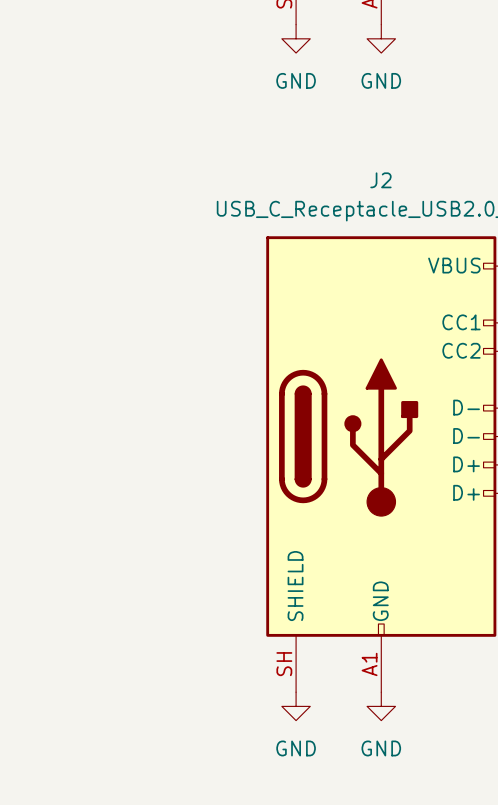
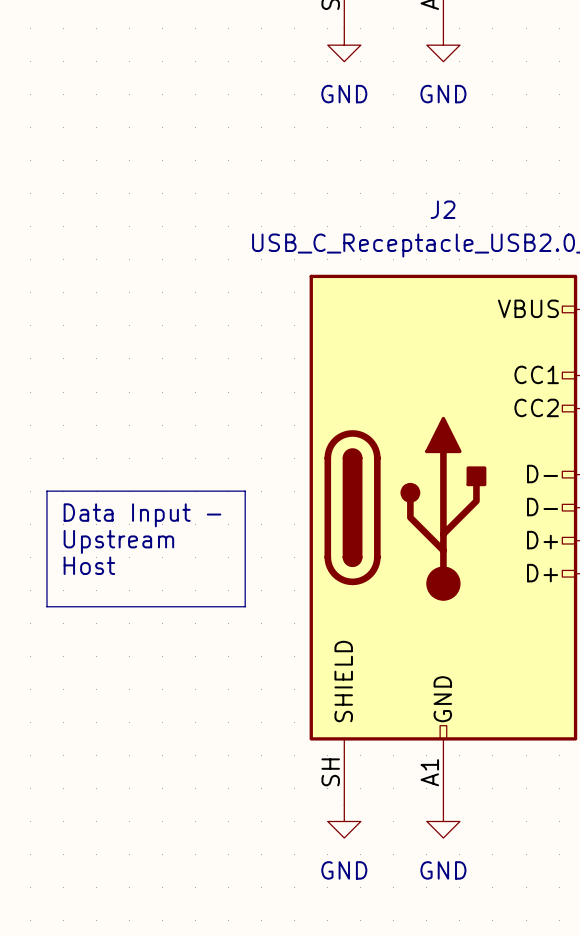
line: none -> (46, 491) (245, 491) (245, 606) (46, 606) (46, 491)
text: none -> Data Input - (142, 515)
text: none -> Upstream (118, 541)
text: none -> Host (89, 565)

